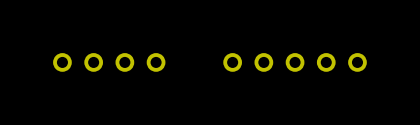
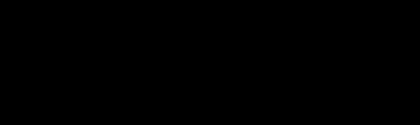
part: (109, 62) -> none
part: (295, 62) -> none

